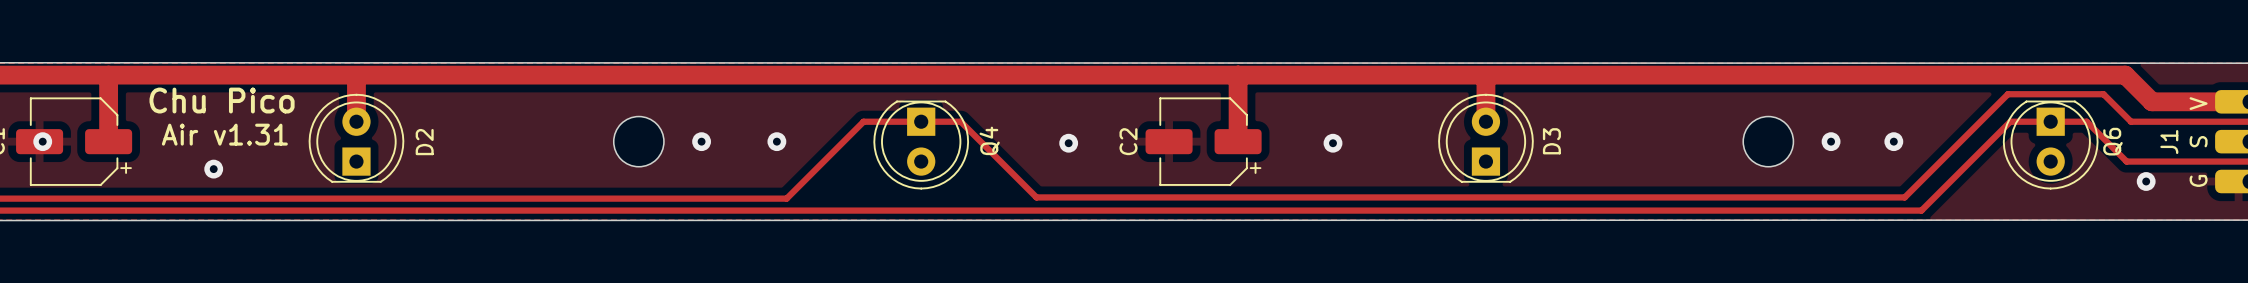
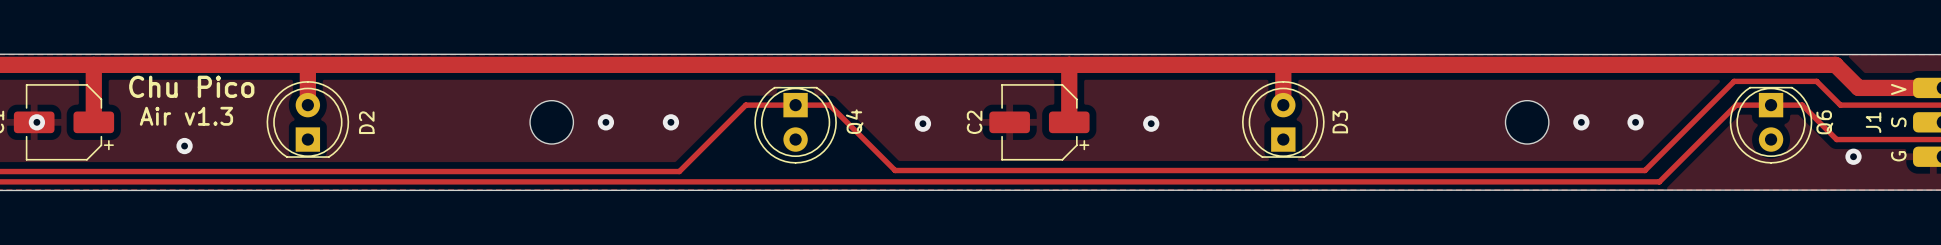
text: Air v1.31 (224, 134) -> Air v1.3 (186, 116)

